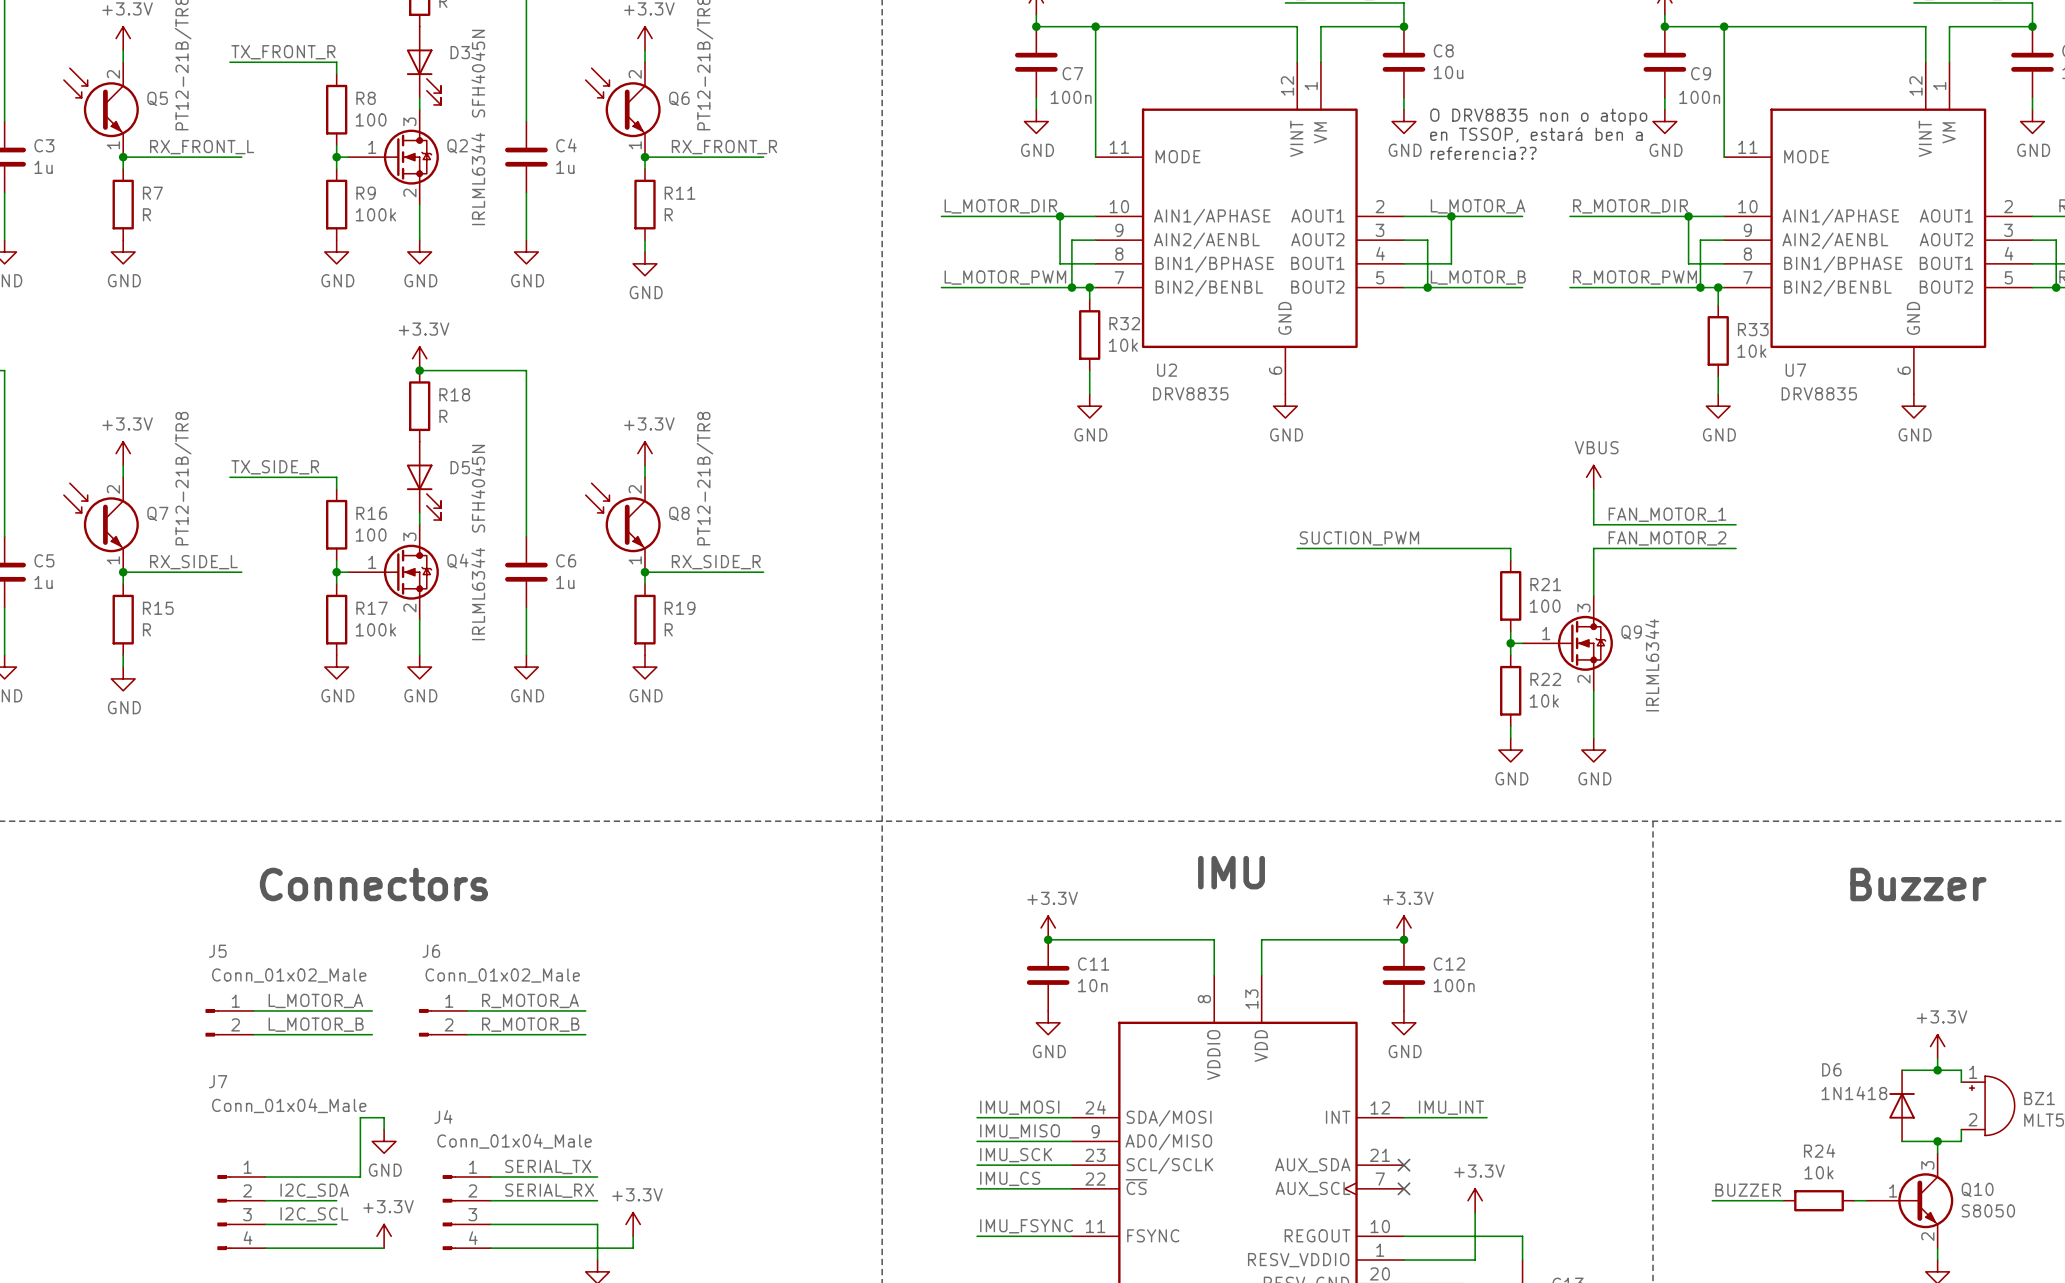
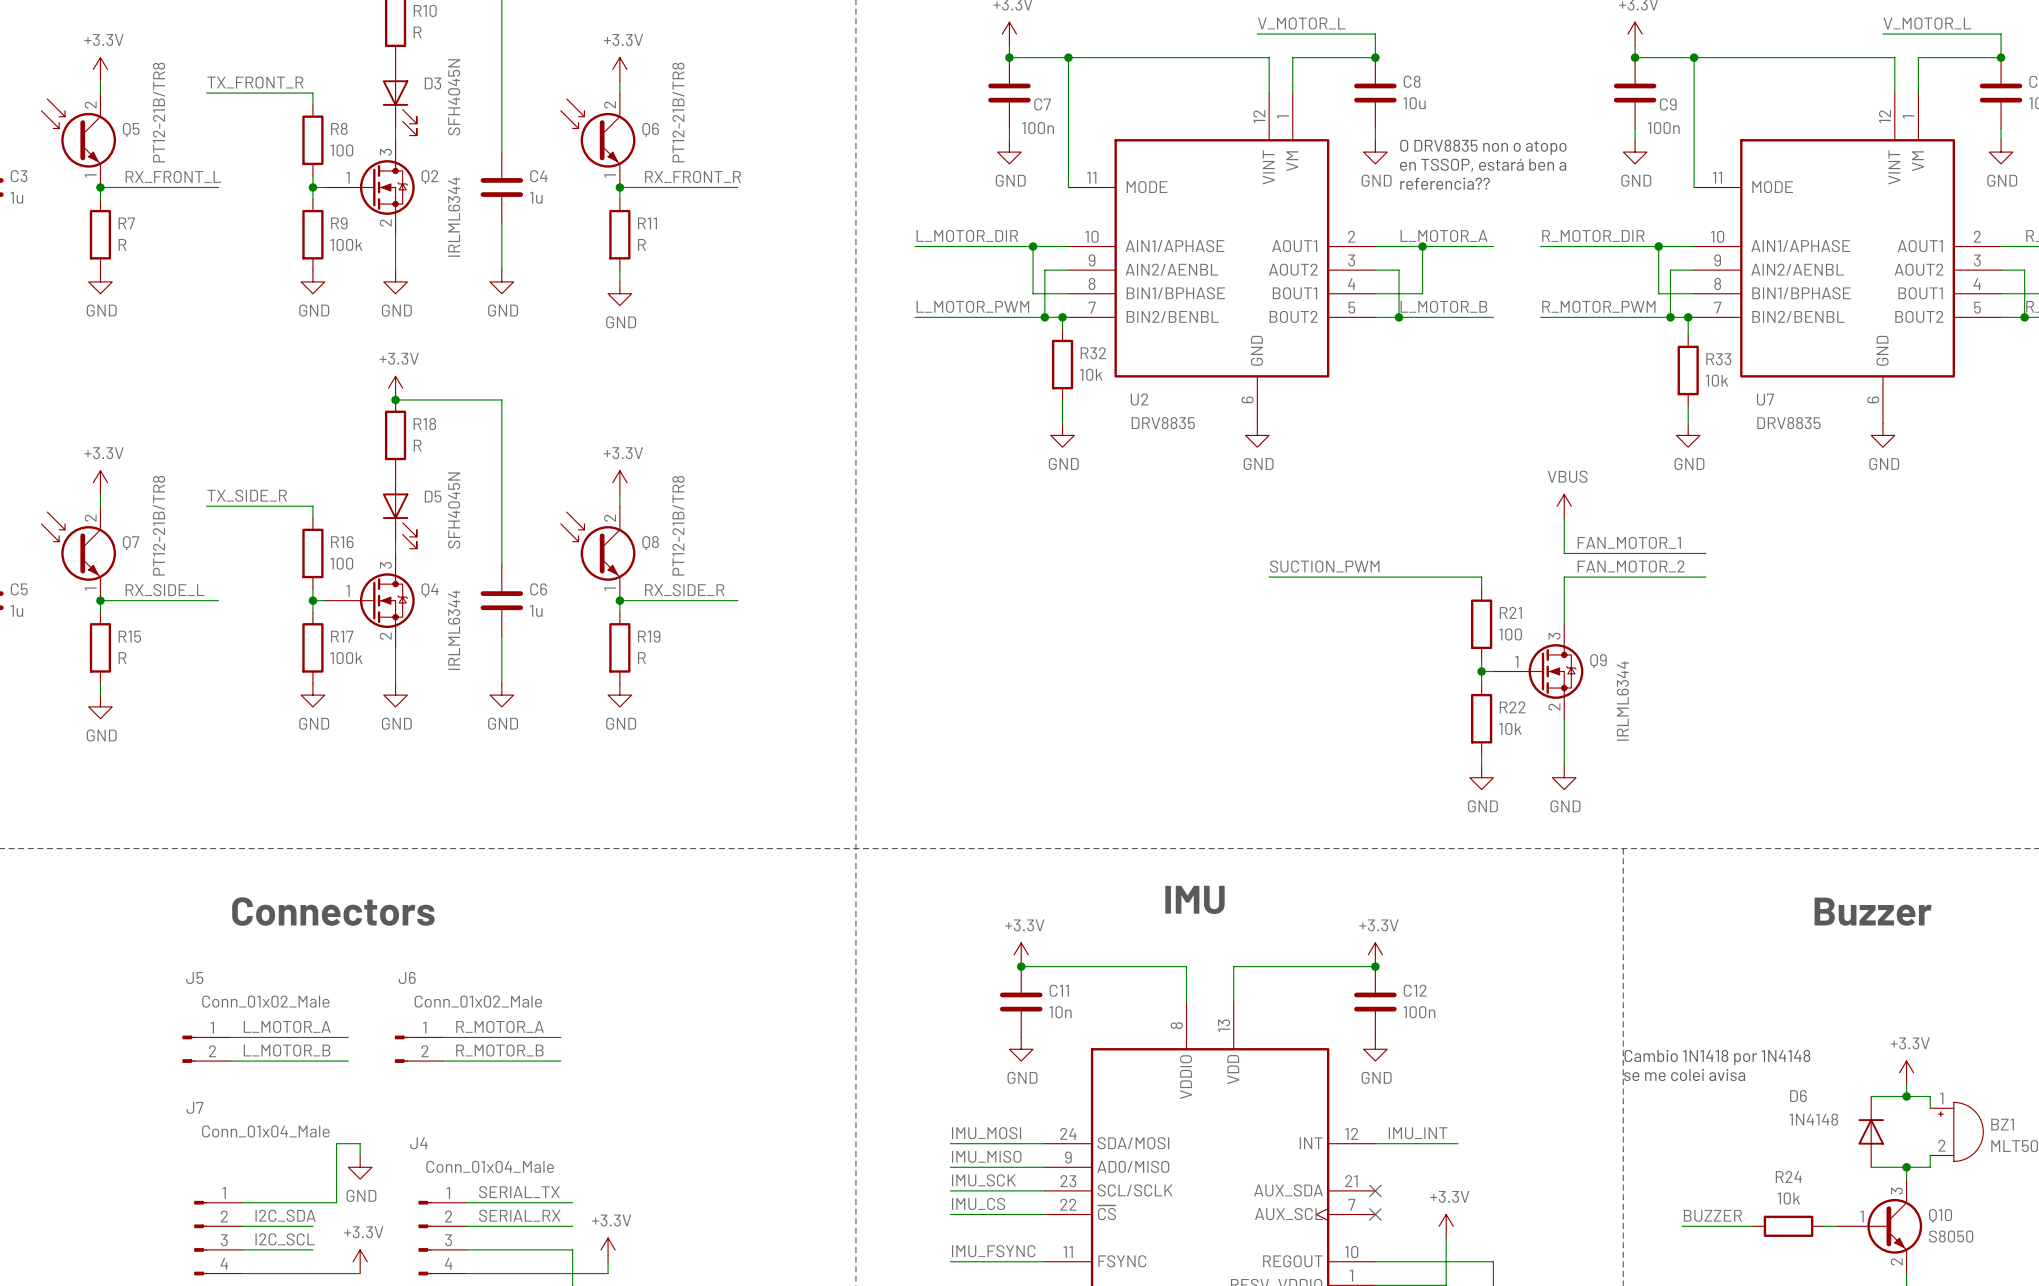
text: none -> Cambio 1N1418 por 1N4148 (1717, 1057)
text: none -> se me colei avisa (1684, 1074)
D6 value: 1N1418 (1854, 1093) -> 1N4148 (1813, 1119)

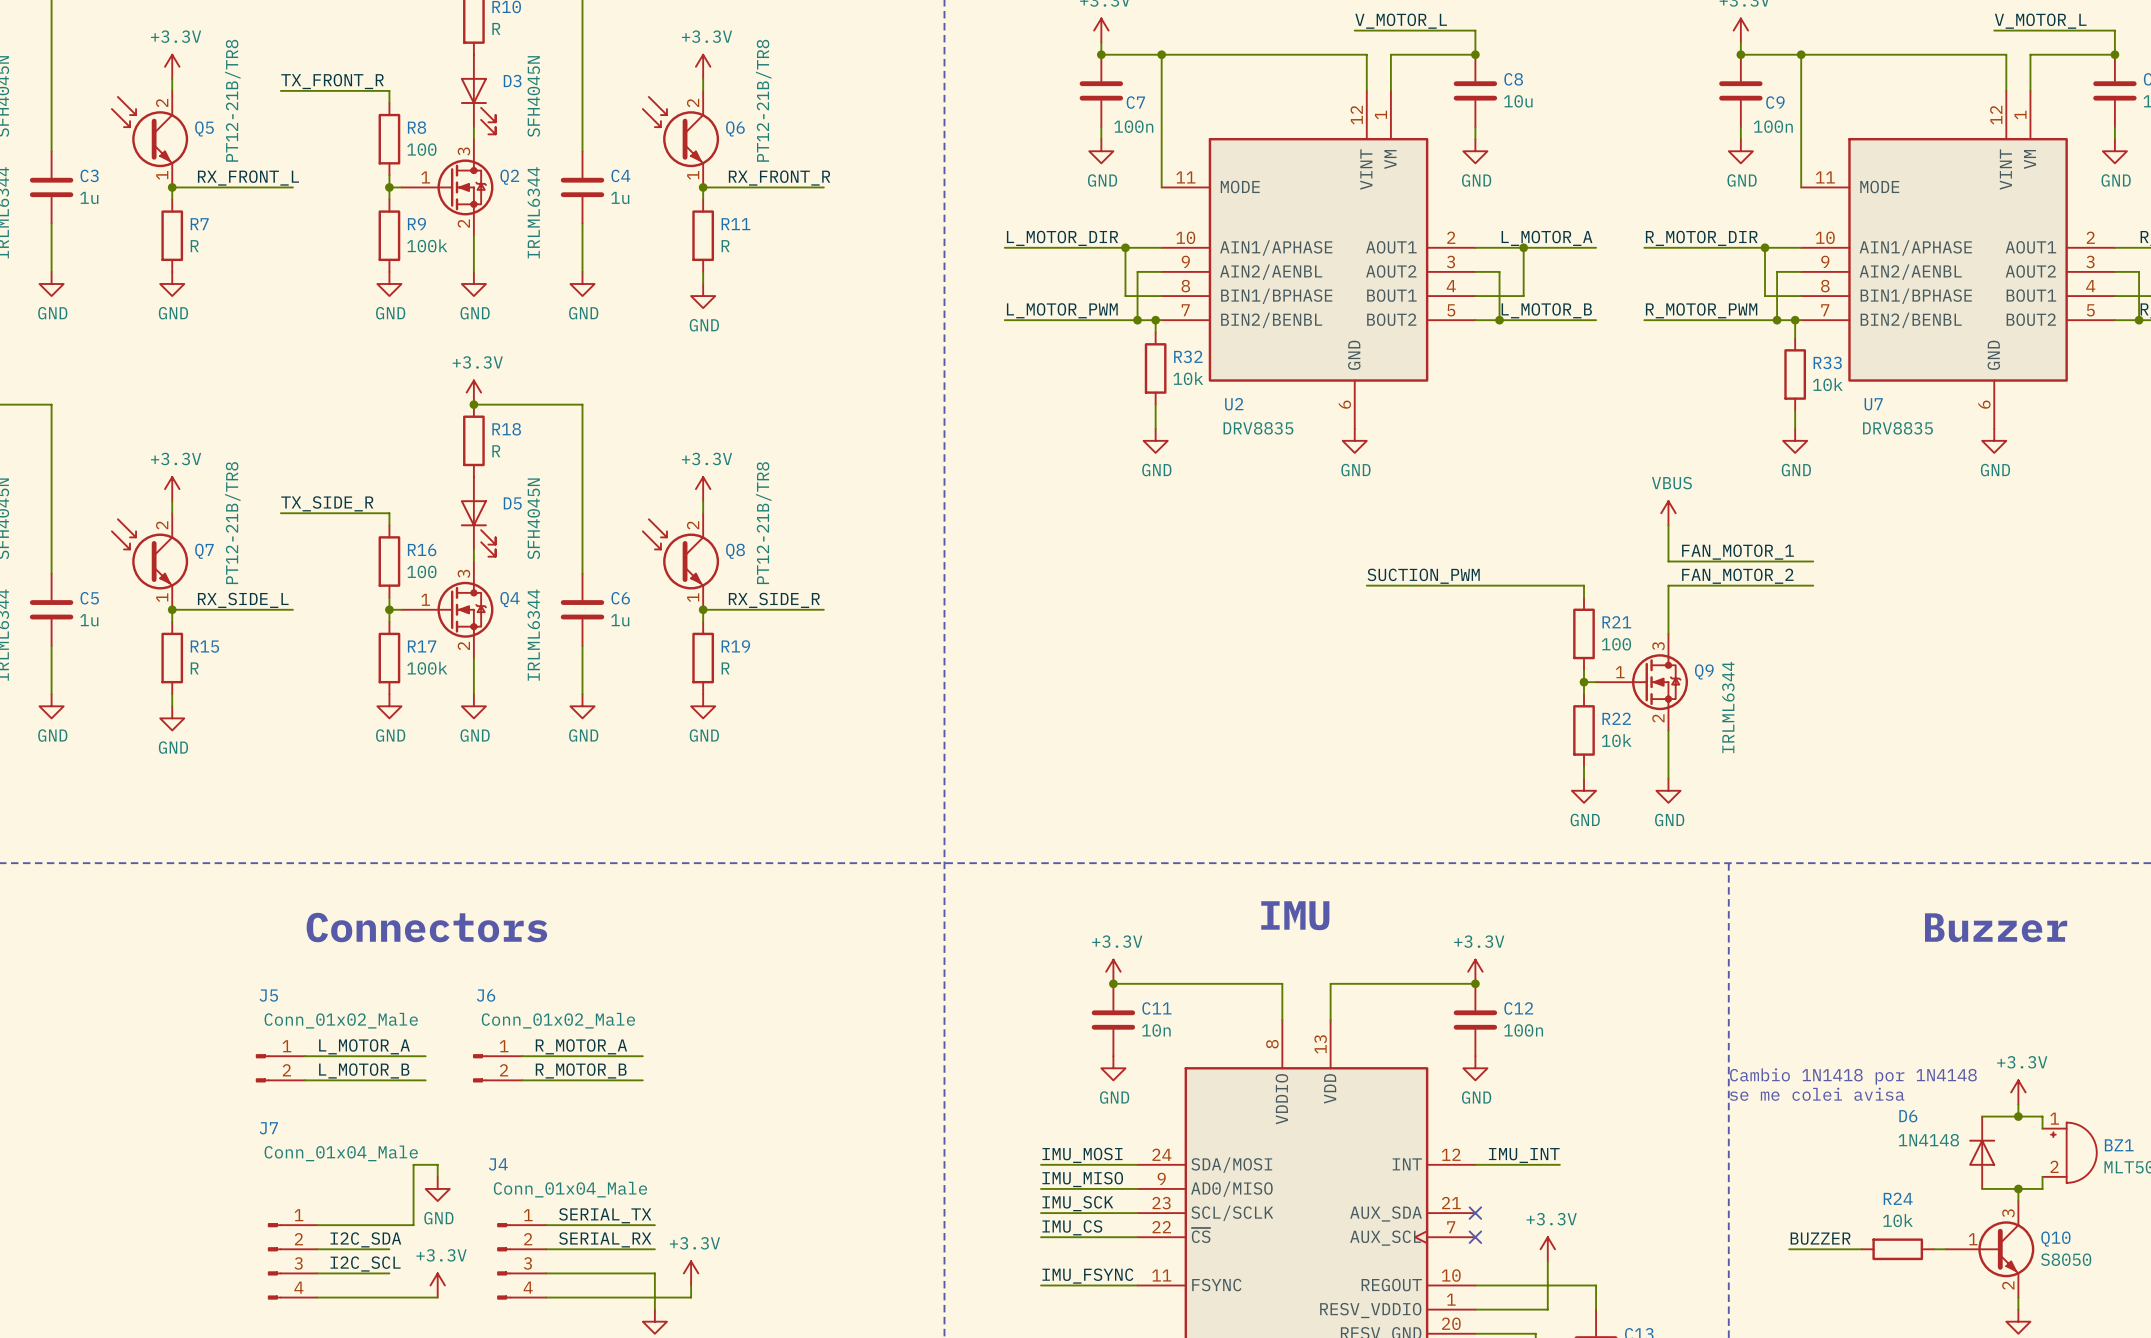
text: O DRV8835 non o atopo (1483, 147) -> none
text: en TSSOP, estará ben a (1483, 165) -> none
text: referencia?? (1445, 183) -> none

